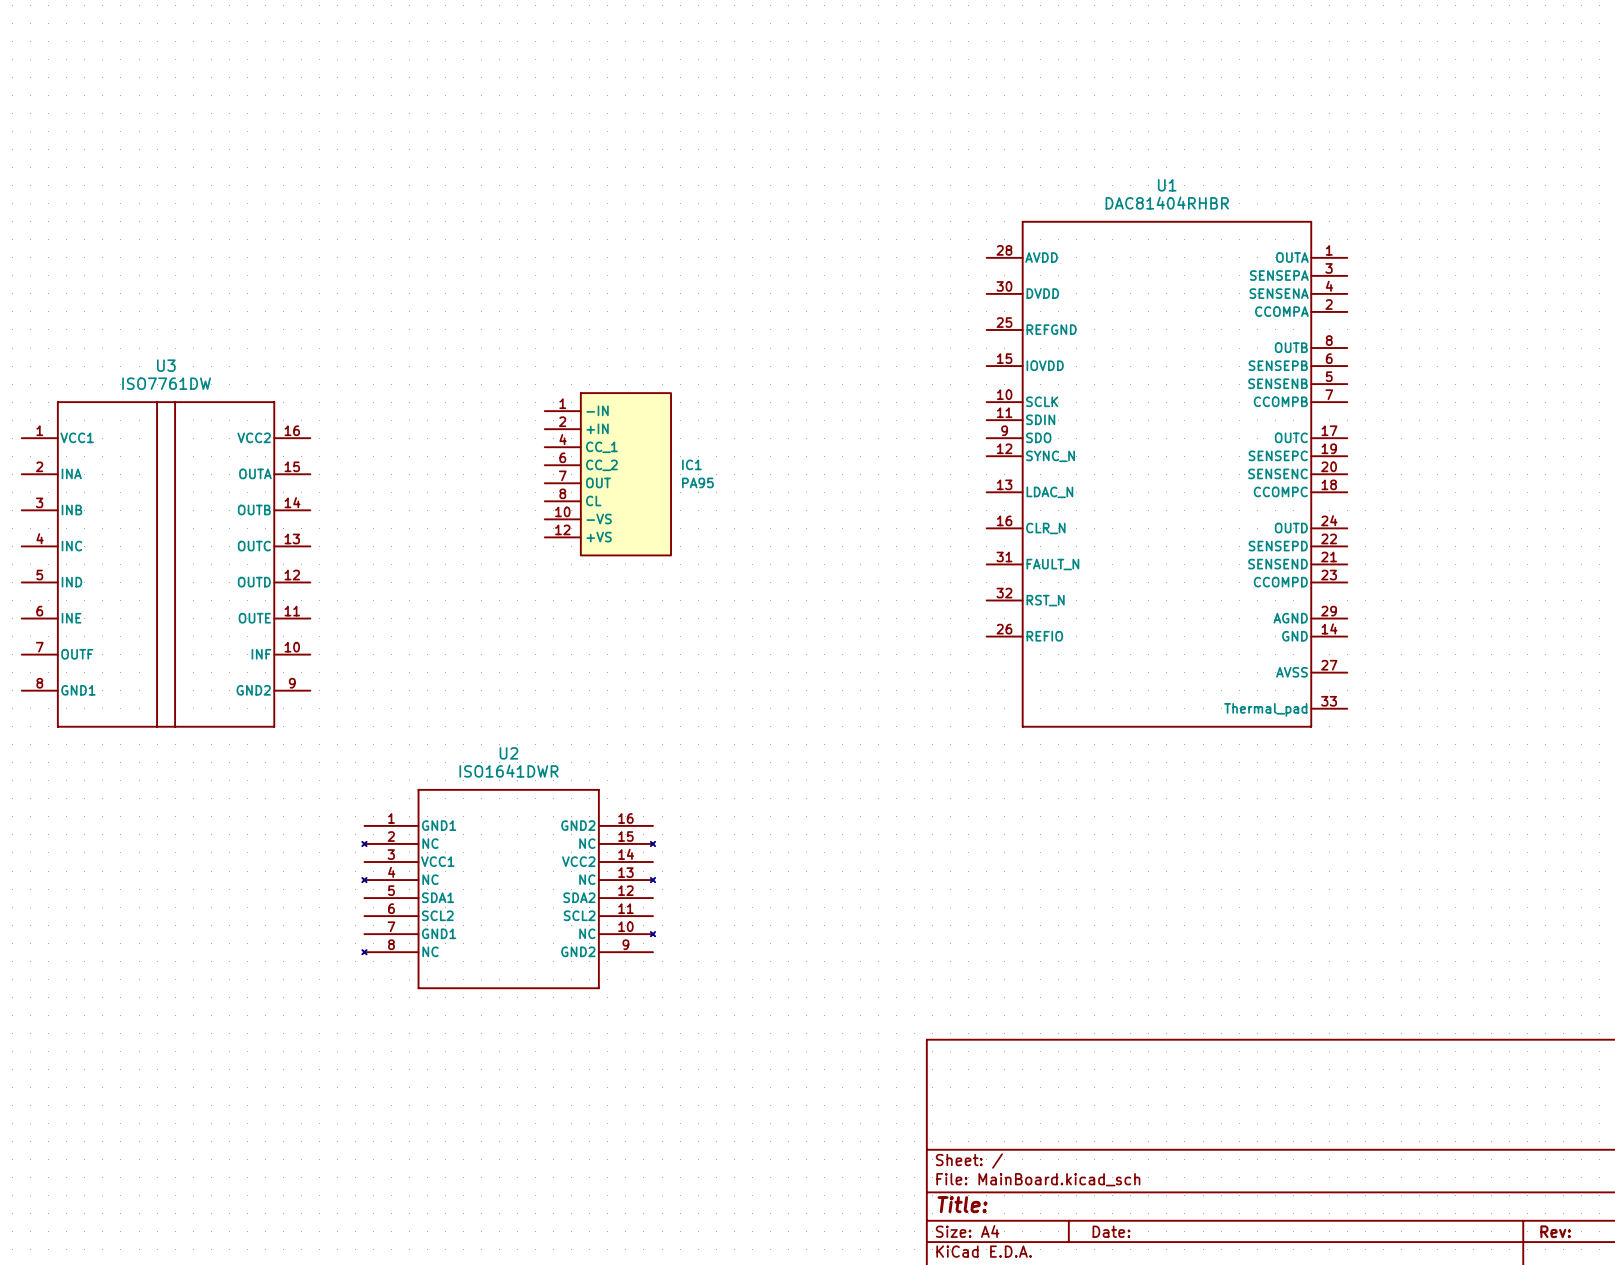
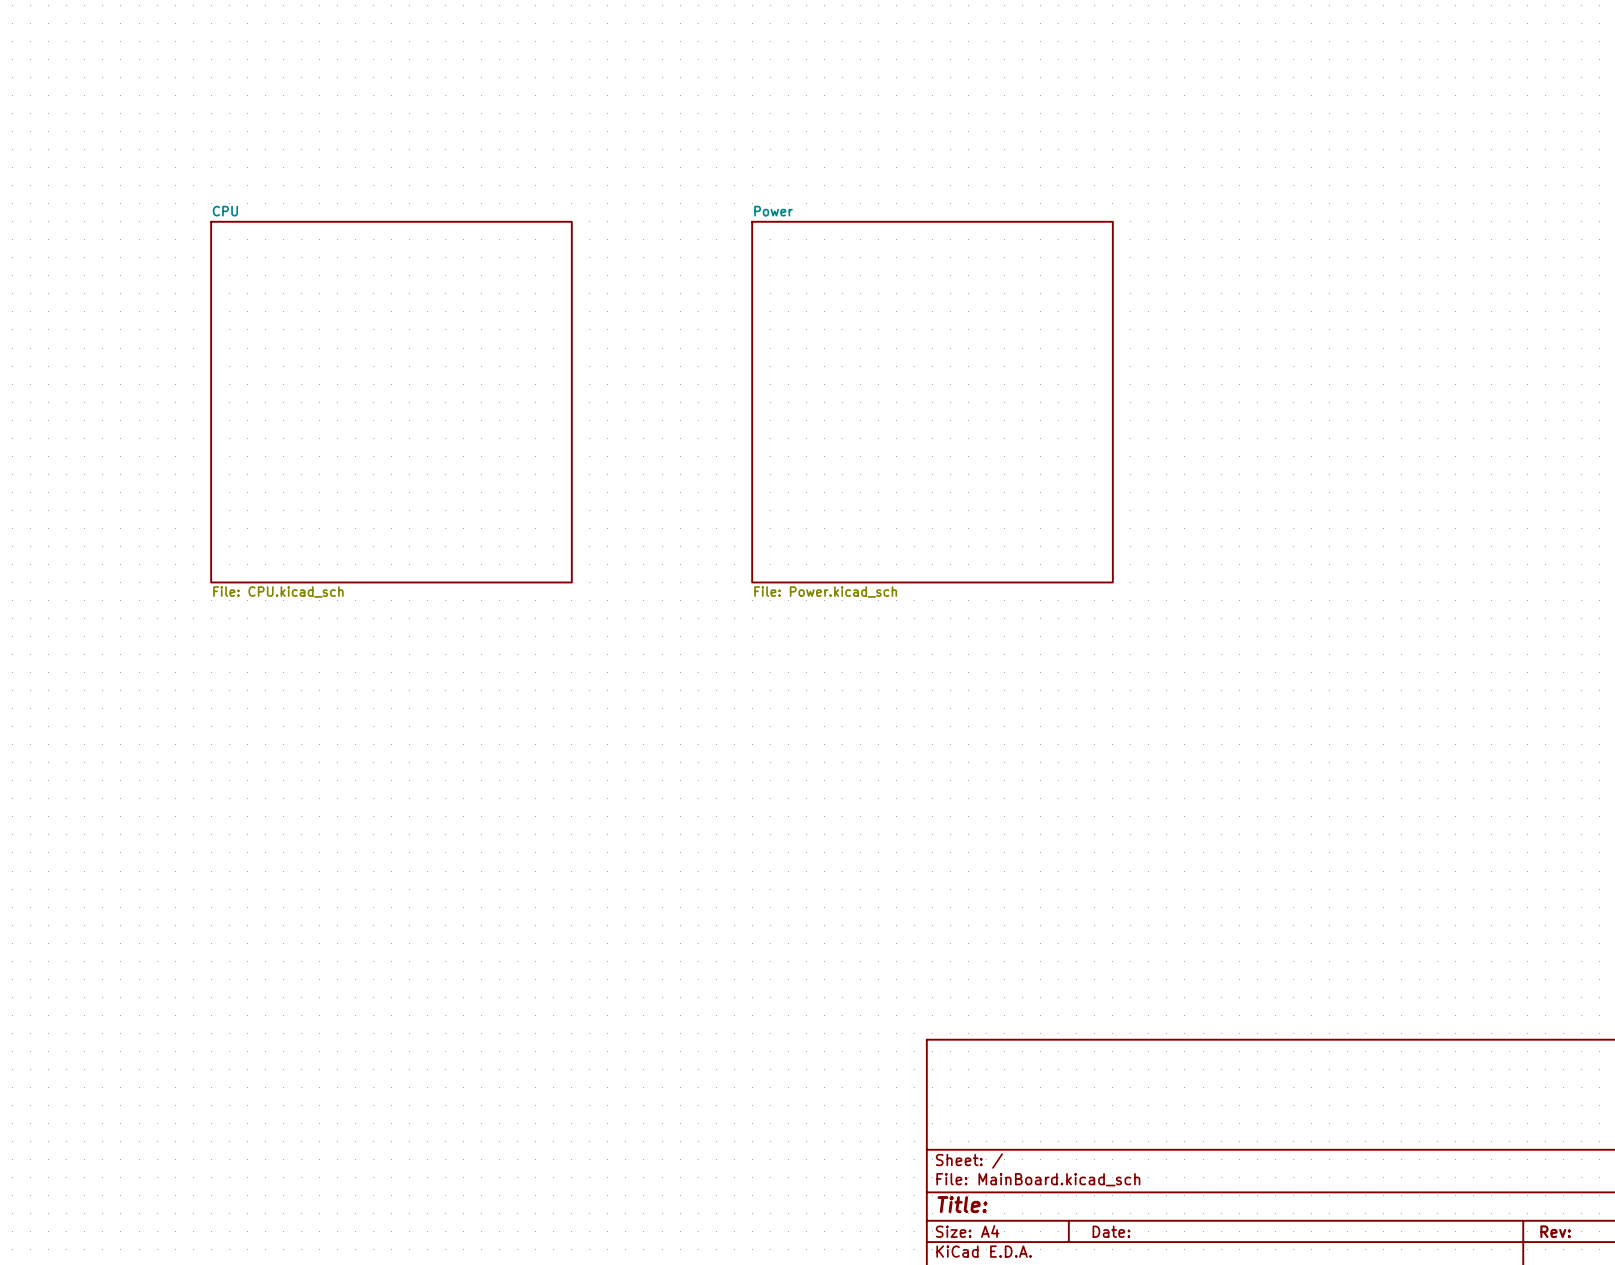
sheet CPU: none -> File: CPU.kicad_sch (391, 402)
sheet Power: none -> File: Power.kicad_sch (932, 402)
IC1: PA95 (608, 474) -> none
U1: DAC81404RHBR (1166, 474) -> none
U3: ISO7761DW (166, 564) -> none
U2: ISO1641DWR (508, 889) -> none

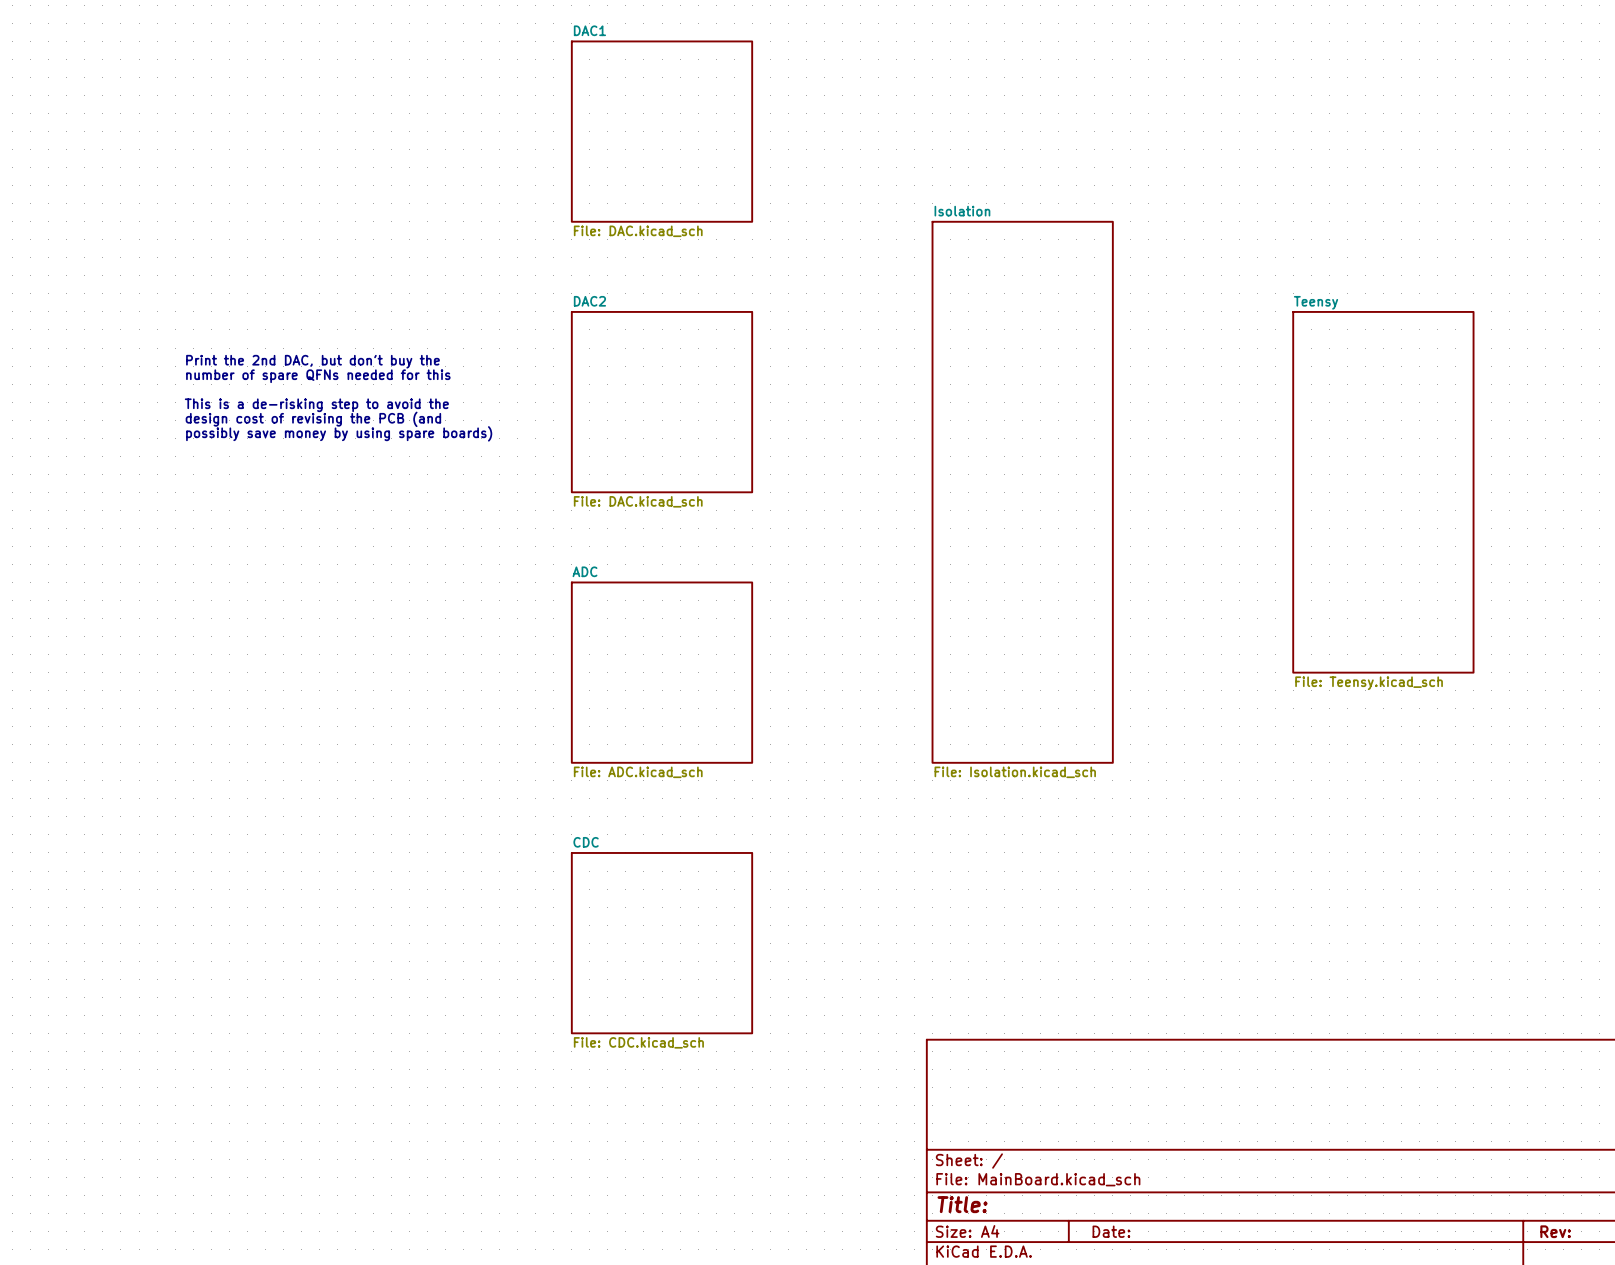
sheet DAC1: none -> File: DAC.kicad_sch (662, 131)
text: none -> Print the 2nd DAC, but don't buy the (312, 361)
text: none -> number of spare QFNs needed for this (318, 376)
sheet CPU: File: CPU.kicad_sch (391, 402) -> none
sheet DAC2: none -> File: DAC.kicad_sch (662, 402)
sheet Power: File: Power.kicad_sch (932, 402) -> none
text: none -> This is a de-risking step to avoid the (316, 405)
text: none -> design cost of revising the PCB (and (313, 419)
text: none -> possibly save money by using spare boards) (339, 433)
sheet Isolation: none -> File: Isolation.kicad_sch (1022, 492)
sheet Teensy: none -> File: Teensy.kicad_sch (1383, 492)
sheet ADC: none -> File: ADC.kicad_sch (662, 672)
sheet CDC: none -> File: CDC.kicad_sch (662, 943)

